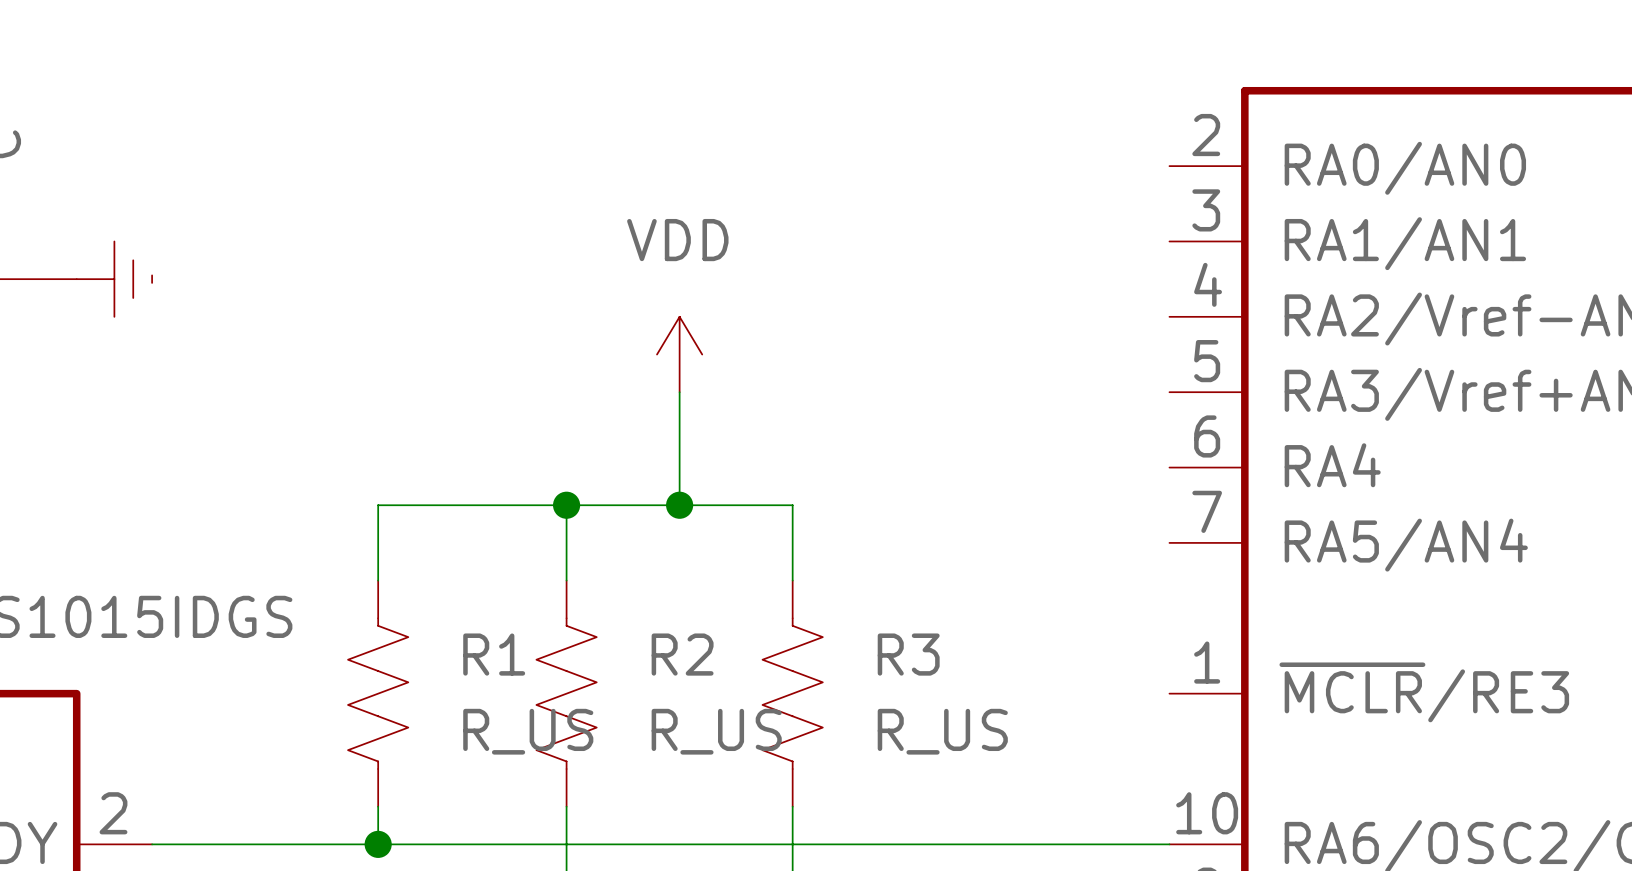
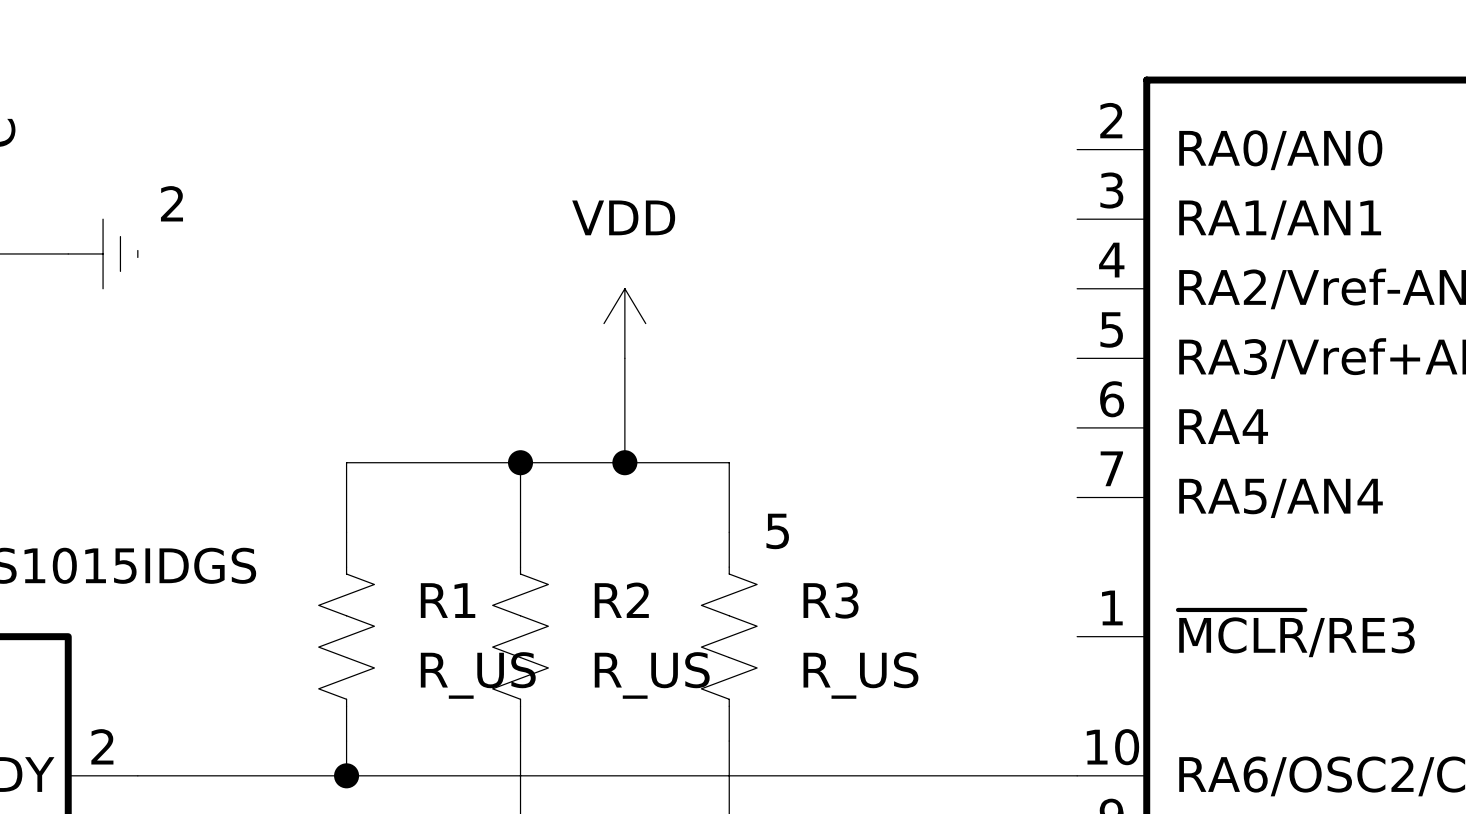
text: none -> 2 (171, 203)
text: none -> 5 (777, 531)

